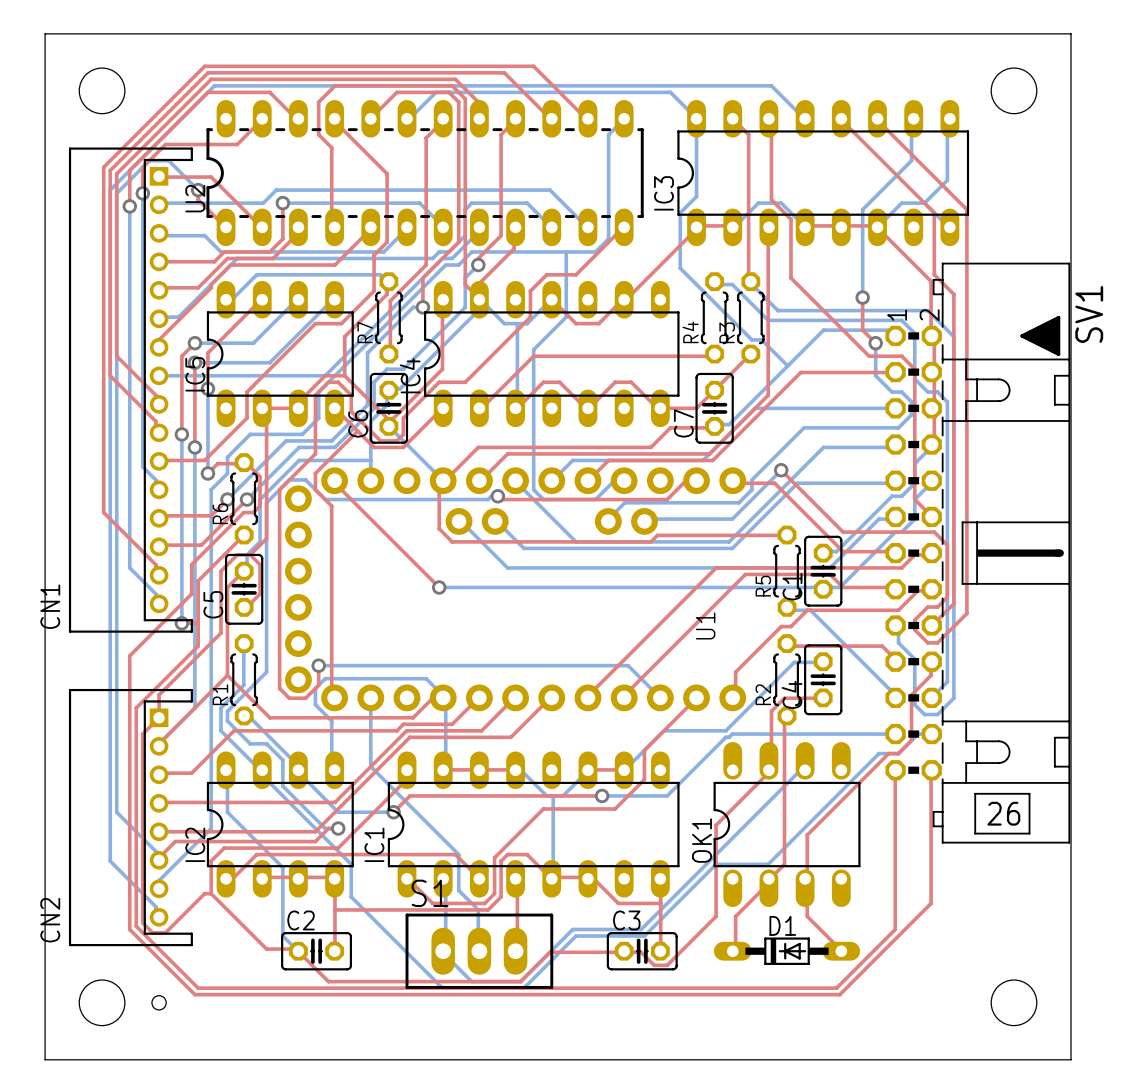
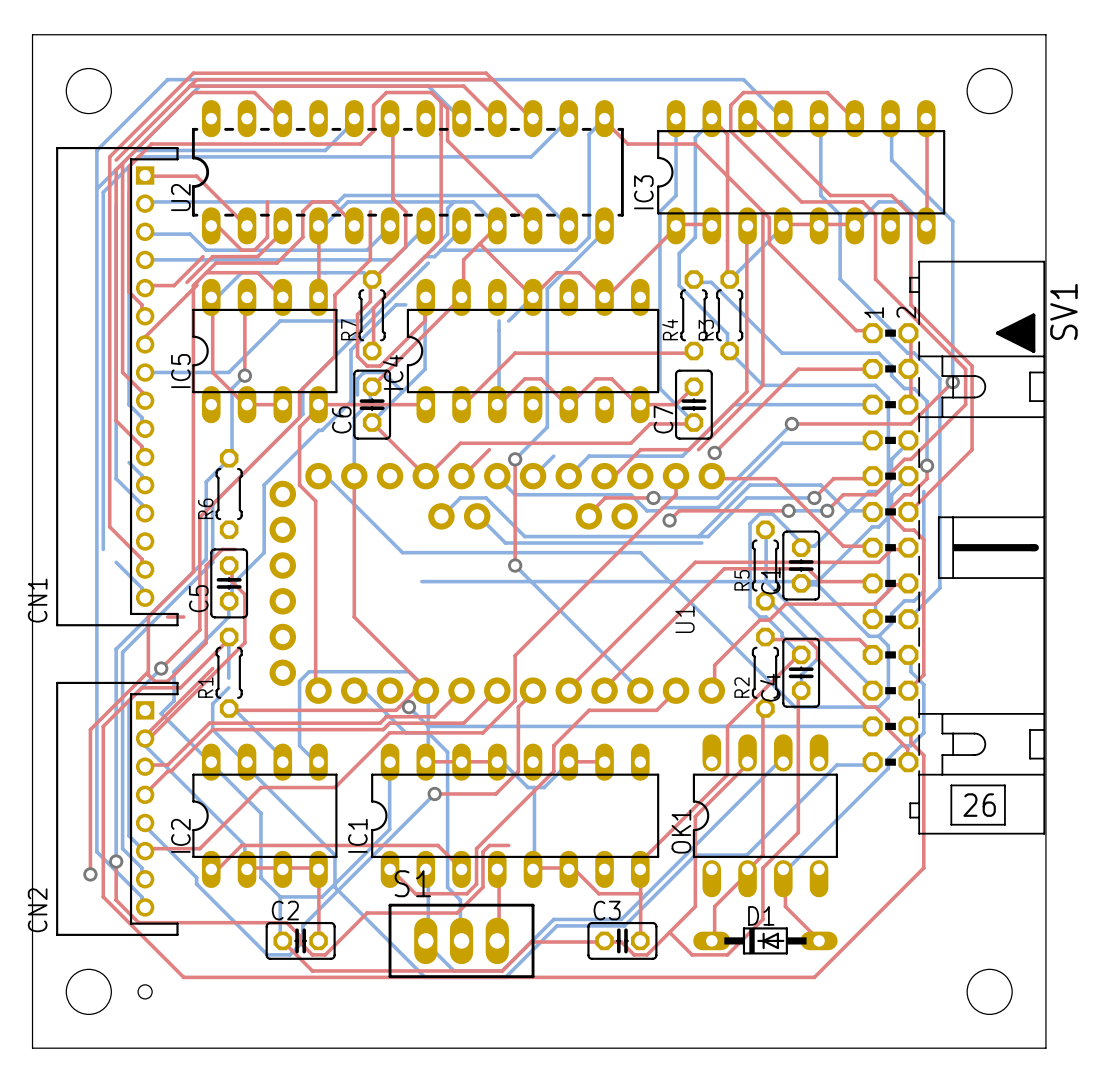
top track: (455, 79) (478, 102) (479, 118) -> (437, 79) (492, 79)
top track: (334, 85) (318, 102) (318, 134) (331, 147) (331, 225) (334, 227) -> (318, 86) (190, 86)
bottom track: (445, 85) (771, 85) -> (428, 86) (461, 118)
top track: (452, 85) (465, 98) (465, 108) -> (441, 102) (447, 108)
bottom track: none -> (750, 86) (743, 79) (167, 79) (96, 150) (96, 189)
top track: (403, 92) (396, 92) (370, 118) -> (386, 92) (373, 105) (373, 131) (360, 144) (222, 144)
top track: (262, 118) (237, 144) -> none
top track: (334, 118) (334, 121) (387, 173) (387, 212) -> none
bottom track: none -> (354, 118) (354, 121) (325, 150) (135, 150)
top track: none -> (390, 118) (392, 121) (392, 198) (405, 211) (405, 246) (372, 279)
bottom track: (407, 118) (409, 118) (435, 92) (670, 92) (696, 118) -> none
top track: (443, 118) (426, 137) (426, 265) (390, 300) (390, 310) -> none
top track: (515, 118) (501, 134) (501, 235) (478, 258) (478, 265) -> (497, 118) (463, 86) (434, 86)
top track: (587, 118) (533, 66) (204, 66) (103, 167) (103, 512) (123, 532) -> none
bottom track: none -> (711, 118) (711, 121) (695, 137) (695, 237) (679, 253) (679, 285)
top track: (841, 118) (934, 212) (934, 216) -> (750, 121) (756, 121) (830, 195) (891, 195) (910, 214)
top track: (877, 118) (966, 209) (966, 613) (937, 642) (927, 642) (914, 629) (914, 620) (927, 607) (937, 607) (947, 597) -> (854, 118) (827, 92) (743, 92) (730, 105) (730, 131) (801, 201) (862, 201) (875, 214) (875, 279) (965, 369) (965, 404) (910, 459) (904, 459) (888, 475) (888, 481) (875, 494) (843, 494) (827, 510)
bottom track: (913, 118) (911, 121) (911, 160) (862, 209) (862, 216) -> (819, 118) (820, 121) (820, 195) (840, 214)
bottom track: none -> (890, 118) (891, 160) (952, 221) (952, 382)
top track: none -> (926, 118) (926, 225)
bottom track: (949, 118) (947, 121) (947, 180) (924, 203) -> none
top track: (771, 121) (771, 199) -> (604, 118) (627, 144) (695, 144) (750, 198)
top track: (465, 141) (465, 284) (479, 299) (471, 291) (514, 248) (514, 229) -> (447, 140) (533, 225)
top track: (123, 157) (110, 170) (110, 375) (155, 421) (155, 431) (159, 432) -> (109, 156) (109, 526)
top track: (129, 160) (116, 173) (116, 356) (136, 375) -> (122, 163) (122, 372)
bottom track: (149, 160) (168, 160) (198, 190) -> (135, 160) (138, 156) (531, 156) (568, 118)
top track: (198, 190) (198, 199) (226, 227) -> none
via: (198, 190) -> none
top track: none -> (129, 192) (129, 292) (141, 304) (141, 314) (145, 316)
via: (142, 193) -> none
bottom track: (556, 196) (549, 190) (276, 190) (263, 203) -> (537, 195) (344, 195) (338, 201)
bottom track: none -> (248, 201) (267, 201)
via: (282, 203) -> none
bottom track: (354, 203) (364, 203) -> (318, 225) (325, 224) (347, 201)
bottom track: (419, 203) (443, 227) -> (402, 201) (454, 201)
bottom track: (491, 203) (527, 203) (551, 227) -> (473, 201) (497, 225)
top track: none -> (116, 205) (116, 420) (141, 446) (141, 456) (145, 457)
via: (129, 206) -> none
top track: none -> (762, 211) (762, 385)
top track: none -> (318, 225) (318, 297)
top track: (370, 227) (334, 265) (292, 265) -> (354, 225) (331, 201) (312, 201) (302, 211) (302, 237) (277, 263)
bottom track: none -> (425, 225) (392, 259) (145, 259)
top track: (624, 227) (576, 274) (546, 274) (530, 291) (530, 317) (465, 382) (439, 382) (403, 418) (403, 434) (396, 440) (380, 440) (351, 411) (351, 395) (338, 382) (328, 382) -> none
bottom track: (732, 227) (758, 203) (781, 203) (805, 227) -> (729, 279) (783, 225)
top track: (877, 227) (931, 281) (931, 335) -> none
top track: none -> (495, 227) (463, 259) (463, 295) (372, 386)
top track: (387, 242) (374, 255) (374, 291) (341, 323) (315, 323) (247, 392) (247, 418) (204, 460) (159, 461) -> (370, 240) (370, 259) (334, 295) (334, 356) (312, 378)
top track: (791, 245) (791, 278) (869, 356) (901, 356) (914, 369) (914, 499) (931, 516) -> (769, 243) (856, 330) (872, 330) (872, 333)
top track: (256, 251) (224, 251) (217, 258) -> (241, 250) (219, 227) (211, 225)
bottom track: (448, 251) (439, 251) (432, 258) (237, 258) (178, 317) (159, 317) (159, 318) -> none
bottom track: (471, 251) (458, 265) (445, 265) -> (454, 250) (441, 250)
bottom track: (566, 251) (566, 291) -> (604, 225) (602, 227) (602, 234) (547, 288)
top track: (159, 261) (214, 261) -> none
bottom track: (478, 265) (465, 278) (465, 307) (403, 369) (387, 369) (380, 375) -> (402, 391) (383, 372) (363, 372)
via: (478, 265) -> none
bottom track: (680, 268) (699, 287) -> (659, 266) (659, 388) (693, 422)
top track: none -> (206, 272) (257, 272) (282, 297)
top track: (934, 274) (953, 294) (953, 603) (931, 625) -> (910, 272) (910, 304) (972, 366) (972, 449) (908, 511)
top track: (422, 278) (422, 307) -> (405, 275) (373, 308)
bottom track: (750, 281) (777, 310) (927, 310) (953, 336) (953, 698) (937, 714) (924, 714) (914, 704) (914, 659) (898, 642) (898, 626) (895, 625) -> (888, 411) (888, 591) (875, 604) (875, 617) (872, 619)
bottom track: (862, 281) (862, 297) -> (840, 279) (878, 317)
top track: (201, 284) (198, 287) (188, 287) -> (199, 259) (174, 285)
top track: (387, 294) (344, 336) (344, 375) -> none
top track: (862, 297) (862, 330) (875, 343) -> none
via: (862, 297) -> none
top track: none -> (211, 297) (212, 372) (247, 404)
bottom track: (298, 299) (253, 343) (194, 343) -> none
bottom track: (334, 299) (269, 362) (194, 362) -> none
top track: (551, 299) (576, 323) (598, 323) (624, 299) -> (479, 243) (533, 297) (556, 272) (579, 272) (604, 297)
top track: (260, 300) (207, 352) -> (196, 282) (193, 285) (193, 349)
top track: none -> (244, 298) (244, 375)
via: (422, 307) -> none
bottom track: (566, 317) (533, 349) (533, 489) (543, 499) -> (547, 314) (547, 427) (515, 459)
bottom track: (768, 320) (901, 320) -> (746, 317) (782, 353) (878, 353) (891, 366)
bottom track: (377, 323) (325, 375) (243, 375) -> (360, 320) (280, 320) (228, 372)
top track: (442, 323) (442, 369) (387, 424) (388, 426) (390, 421) (344, 375) -> (425, 320) (380, 366) (367, 366) (357, 356) (357, 314) (370, 301) (370, 292)
bottom track: (527, 323) (504, 323) (481, 300) (479, 299) (484, 304) (400, 388) (388, 390) -> none
bottom track: (895, 335) (891, 330) (823, 330) (729, 424) (716, 424) (714, 426) -> none
bottom track: (748, 336) (751, 339) (761, 339) (787, 365) -> (727, 333) (727, 349) (762, 385) (875, 385) (878, 388)
bottom track: (914, 339) (914, 369) -> (891, 337) (907, 353) (914, 353) (939, 378) (939, 588) (908, 619)
top track: (194, 343) (181, 356) (181, 434) -> none
via: (194, 343) -> none
bottom track: (875, 343) (875, 375) (891, 392) (901, 392) -> none
via: (875, 343) -> none
top track: (750, 354) (714, 390) -> none
top track: (194, 362) (194, 447) -> none
via: (194, 362) -> none
top track: (820, 372) (800, 372) (784, 388) -> (798, 369) (714, 452)
top track: (344, 375) (325, 375) (299, 401) (298, 408) -> none
bottom track: none -> (244, 375) (232, 388) (232, 456) (206, 481) (206, 559) (116, 649) (116, 861)
via: none -> (244, 375)
top track: none -> (952, 382) (910, 423) (791, 423)
via: none -> (952, 382)
bottom track: (207, 388) (207, 473) -> none
via: (207, 388) -> none
bottom track: (374, 398) (374, 408) (334, 447) (299, 447) (247, 499) -> none
bottom track: (947, 401) (947, 496) -> (923, 398) (927, 401) (927, 465)
bottom track: (142, 408) (142, 466) -> (129, 404) (141, 417) (141, 427) (145, 428)
top track: (266, 408) (266, 538) (250, 554) (260, 564) (260, 594) (247, 607) (244, 607) -> none
top track: (334, 408) (374, 447) (403, 447) (442, 408) -> (318, 404) (425, 404)
top track: (934, 408) (934, 444) (931, 444) -> none
bottom track: (911, 414) (898, 427) (804, 427) (751, 480) (751, 489) -> (791, 423) (730, 485)
top track: (315, 421) (315, 431) -> (322, 404) (299, 427)
top track: none -> (299, 417) (199, 517) (199, 629) (161, 668)
bottom track: (388, 426) (443, 480) -> (372, 422) (425, 369) (425, 297)
via: none -> (791, 423)
top track: (357, 431) (315, 473) -> (299, 449) (299, 469)
bottom track: (181, 434) (181, 623) -> none
via: (181, 434) -> none
bottom track: (302, 434) (250, 434) (227, 457) (227, 473) (211, 489) (211, 828) (159, 880) (159, 888) -> (286, 430) (212, 504) (212, 562) (122, 652) (122, 848) (141, 867) (141, 877) (145, 879)
bottom track: (338, 434) (331, 440) (286, 440) (227, 499) -> (322, 430) (318, 430) (273, 475)
bottom track: (194, 447) (194, 708) (159, 743) (159, 746) -> (247, 869) (244, 867) (244, 845) (145, 745) (145, 738)
via: (194, 447) -> none
bottom track: (823, 447) (768, 502) -> (801, 443) (782, 443) (759, 465)
top track: (315, 453) (279, 489) (279, 688) (289, 698) (305, 698) (318, 685) (318, 665) -> none
top track: (507, 453) (660, 453) -> (604, 476) (614, 475) (640, 449)
top track: (719, 453) (712, 460) (608, 460) (587, 480) -> none
via: none -> (714, 452)
bottom track: (370, 460) (299, 460) (260, 499) (260, 541) (247, 554) (247, 571) (244, 571) -> none
bottom track: (572, 460) (608, 460) -> (568, 476) (589, 456)
top track: none -> (515, 459) (515, 565)
via: none -> (515, 459)
top track: (781, 470) (843, 532) (934, 532) (937, 535) -> (927, 465) (927, 478) (910, 494) (904, 494) (891, 507) (891, 517) (904, 530) (914, 530)
via: (781, 470) -> none
via: none -> (927, 465)
top track: (207, 473) (217, 463) (247, 463) (260, 476) (260, 506) (253, 512) (243, 512) (191, 564) (191, 594) -> (193, 385) (193, 571) (177, 588)
via: (207, 473) -> none
bottom track: (289, 480) (305, 480) (325, 499) (488, 499) (491, 496) (497, 496) -> none
top track: (334, 480) (334, 483) (439, 587) -> none
bottom track: none -> (318, 476) (318, 478) (328, 478) (402, 552) (640, 552) (795, 707) (878, 707) (888, 697) (888, 645) (878, 636)
top track: none -> (354, 476) (354, 617) (425, 690)
top track: (443, 480) (439, 486) (439, 528) (452, 541) (650, 541) (657, 535) (787, 535) -> (425, 476) (372, 422)
bottom track: (624, 480) (621, 483) (611, 483) (595, 499) -> none
top track: none -> (872, 476) (872, 478) (833, 478) (814, 497)
bottom track: (895, 480) (895, 483) (797, 483) (732, 548) (722, 548) -> none
bottom track: (129, 483) (129, 567) -> (116, 478) (141, 504) (141, 510) (145, 513)
top track: (696, 483) (683, 483) (667, 499) (501, 499) (497, 496) -> (676, 478) (676, 494) (515, 655) (515, 700) (482, 732) (389, 732)
top track: (774, 483) (843, 551) (865, 551) -> (753, 478) (775, 478) (843, 546)
bottom track: (279, 489) (266, 502) (266, 672) (243, 694) -> (264, 485) (264, 552) (232, 584) (232, 600) (229, 601) (228, 617) (174, 671) (174, 700) (161, 713) (211, 762)
via: (497, 496) -> none
top track: (227, 499) (211, 515) (159, 515) (159, 518) -> none
via: (227, 499) -> none
top track: (247, 499) (201, 545) (159, 545) (159, 546) -> none
via: (247, 499) -> none
bottom track: (533, 499) (576, 541) -> (515, 494) (524, 494)
top track: none -> (653, 497) (605, 497) (588, 516)
bottom track: (673, 502) (624, 502) (608, 519) -> none
via: none -> (653, 497)
bottom track: none -> (746, 497) (814, 497)
via: none -> (814, 497)
bottom track: (738, 512) (732, 519) (647, 519) -> (717, 507) (663, 507) (659, 510) (647, 510) (630, 494) (576, 494)
top track: none -> (788, 510) (679, 510) (669, 520)
bottom track: none -> (788, 510) (827, 510)
via: none -> (788, 510)
via: none -> (827, 510)
bottom track: (895, 516) (895, 519) (878, 519) (830, 567) (507, 567) (459, 521) -> (872, 511) (846, 510) (820, 485) (750, 485) (698, 536)
bottom track: none -> (441, 516) (460, 497) (486, 497) (524, 536) (556, 536)
via: none -> (669, 520)
top track: (243, 535) (198, 580) (198, 646) (136, 708) (136, 926) -> (229, 637) (180, 687) (141, 687) (103, 726) (103, 896) (122, 916)
bottom track: (116, 554) (116, 812) (155, 851) (155, 857) -> (161, 668) (129, 700) (129, 835) (141, 848)
top track: (244, 571) (227, 587) (227, 675) (269, 717) -> (229, 565) (232, 565) (232, 581) (244, 594) (244, 642) (151, 736) (145, 736)
via: none -> (515, 565)
via: (439, 587) -> none
bottom track: none -> (801, 583) (817, 584) (869, 636) (878, 636)
top track: none -> (923, 591) (923, 674) (908, 690)
bottom track: (947, 597) (947, 681) (931, 697) -> (923, 591) (914, 600) (904, 600) (891, 613) (891, 623) (878, 636)
bottom track: (794, 610) (810, 610) -> (765, 529) (766, 581) (788, 604)
bottom track: none -> (772, 604) (817, 649) (817, 658) (801, 674) (801, 690)
top track: (162, 623) (129, 655) (129, 870) -> (148, 617) (148, 674) (154, 681) (167, 681) (206, 642) (206, 626)
via position: (181, 623) -> (161, 668)
top track: (220, 633) (159, 694) (159, 717) (142, 734) (142, 922) -> (116, 900) (129, 913)
bottom track: (823, 661) (794, 662) (725, 730) (663, 730) (624, 770) -> (801, 654) (766, 617) (759, 617) (750, 607) (750, 523) (759, 514) (772, 514) (798, 539) (798, 546) (801, 547)
top track: (931, 661) (931, 675) (911, 694) (911, 727) -> (807, 639) (817, 649) (817, 658) (865, 707) (875, 707) (888, 719)
bottom track: none -> (908, 654) (910, 655) (910, 671) (923, 684) (923, 732) (910, 745) (901, 745) (888, 758) (888, 768) (785, 871) (783, 869)
bottom track: (318, 665) (628, 665) -> (515, 565) (608, 658)
via: (318, 665) -> none
top track: none -> (148, 671) (90, 729) (90, 874)
bottom track: (243, 685) (220, 708) (220, 730) (227, 737) -> (212, 713) (212, 729)
top track: (551, 697) (510, 737) (409, 737) (406, 740) -> (533, 690) (518, 707) (518, 771) (495, 793) (434, 793)
bottom track: (370, 698) (370, 766) (458, 854) (458, 890) (465, 896) -> (354, 691) (363, 691) (405, 732) (428, 732) (447, 752) (447, 887)
top track: (784, 698) (820, 698) -> (762, 691) (801, 654)
top track: none -> (798, 691) (798, 832) (762, 867) (762, 919) (727, 954) (692, 954) (669, 932)
bottom track: (315, 704) (331, 721) (331, 769) -> (299, 697) (299, 745) (315, 761)
top track: (771, 711) (771, 769) (768, 770) -> (750, 703) (727, 726) (727, 774) (640, 861) (640, 869)
via: none -> (408, 707)
top track: none -> (229, 708) (232, 710) (254, 710)
top track: (677, 717) (644, 750) (644, 779) (615, 808) (543, 808) -> (656, 710) (589, 710) (553, 745) (553, 771) (524, 800)
bottom track: (227, 721) (250, 743) (266, 743) (282, 760) (282, 786) (325, 828) (338, 828) -> none
top track: (234, 730) (227, 737) -> (219, 723) (209, 723) (167, 765)
bottom track: (732, 734) (725, 737) (667, 795) (602, 795) -> (711, 726) (428, 726) (408, 707)
bottom track: (931, 734) (918, 734) (898, 753) (878, 753) (859, 773) -> (872, 762) (872, 765) (836, 765)
top track: (400, 737) (334, 802) (159, 802) -> (383, 729) (212, 729)
top track: (911, 737) (911, 740) (898, 753) (888, 753) (807, 835) (807, 877) (805, 878) -> (888, 729) (907, 748) (908, 762)
bottom track: (298, 770) (338, 812) (393, 812) -> none
top track: (407, 770) (406, 779) (338, 848) (224, 848) -> (334, 787) (260, 787) (209, 839)
bottom track: none -> (390, 762) (389, 829) (322, 896) (280, 896)
top track: (895, 770) (895, 929) -> (908, 726) (910, 726) (910, 742) (923, 755) (923, 867) (872, 919)
top track: (931, 770) (931, 903) (839, 994) (194, 994) (129, 929) (129, 909) -> none
top track: (181, 773) (191, 773) -> (145, 793) (167, 771) (170, 771) (177, 765)
bottom track: (227, 773) (227, 812) (282, 867) (282, 936) (295, 949) -> (212, 765) (260, 813) (260, 877) (280, 896)
top track: (351, 795) (315, 831) (159, 831) -> none
top track: (602, 795) (409, 795) (393, 812) -> none
via: (602, 795) -> none
bottom track: none -> (434, 793) (302, 925) (302, 942) (289, 954) (267, 954) (196, 884) (196, 877) (145, 826) (145, 822)
via: none -> (434, 793)
via: (393, 812) -> none
top track: (338, 828) (328, 828) (315, 841) (175, 841) (159, 857) -> none
via: (338, 828) -> none
top track: (527, 854) (551, 878) -> none
top track: (214, 857) (211, 861) (211, 893) -> (199, 848) (145, 848)
via: none -> (116, 861)
via: none -> (90, 874)
top track: (211, 893) (266, 949) (295, 949) (298, 951) -> none
top track: (211, 893) (204, 893) (165, 932) -> none
bottom track: none -> (280, 896) (280, 938)
top track: (334, 909) (488, 909) -> (151, 922) (286, 922) (299, 935) (299, 942) (312, 954) (325, 954) (367, 913) (457, 913) (470, 900)

